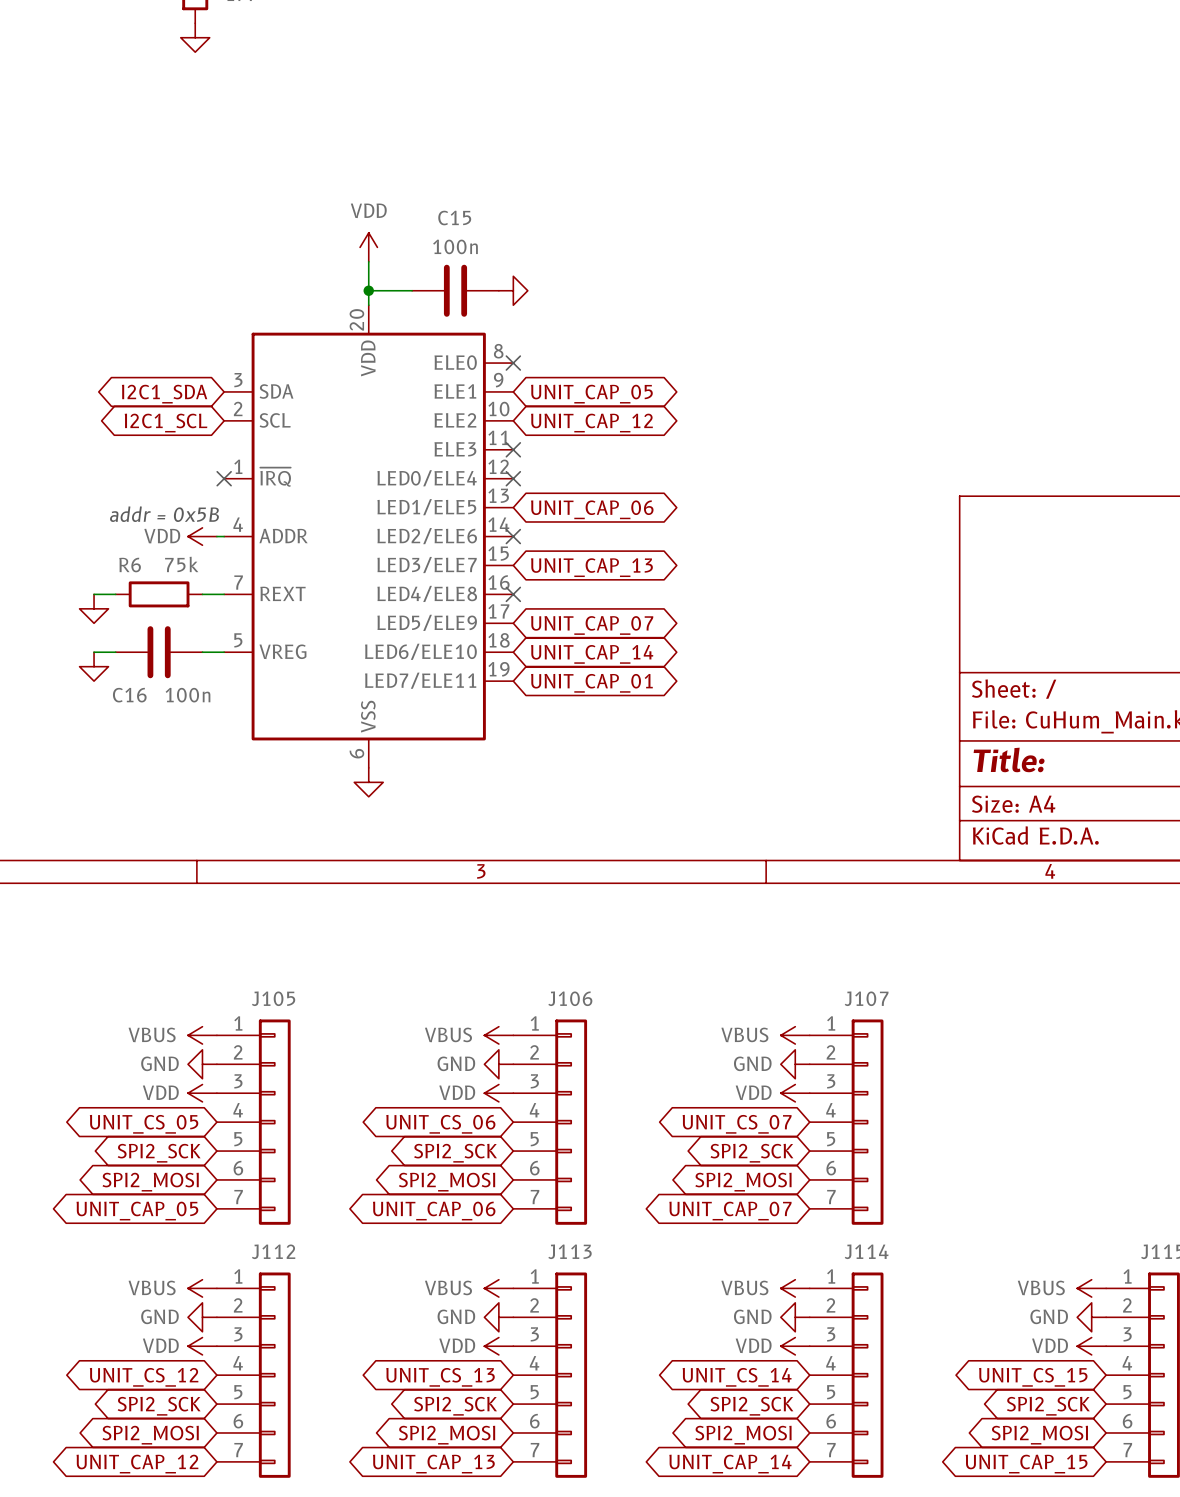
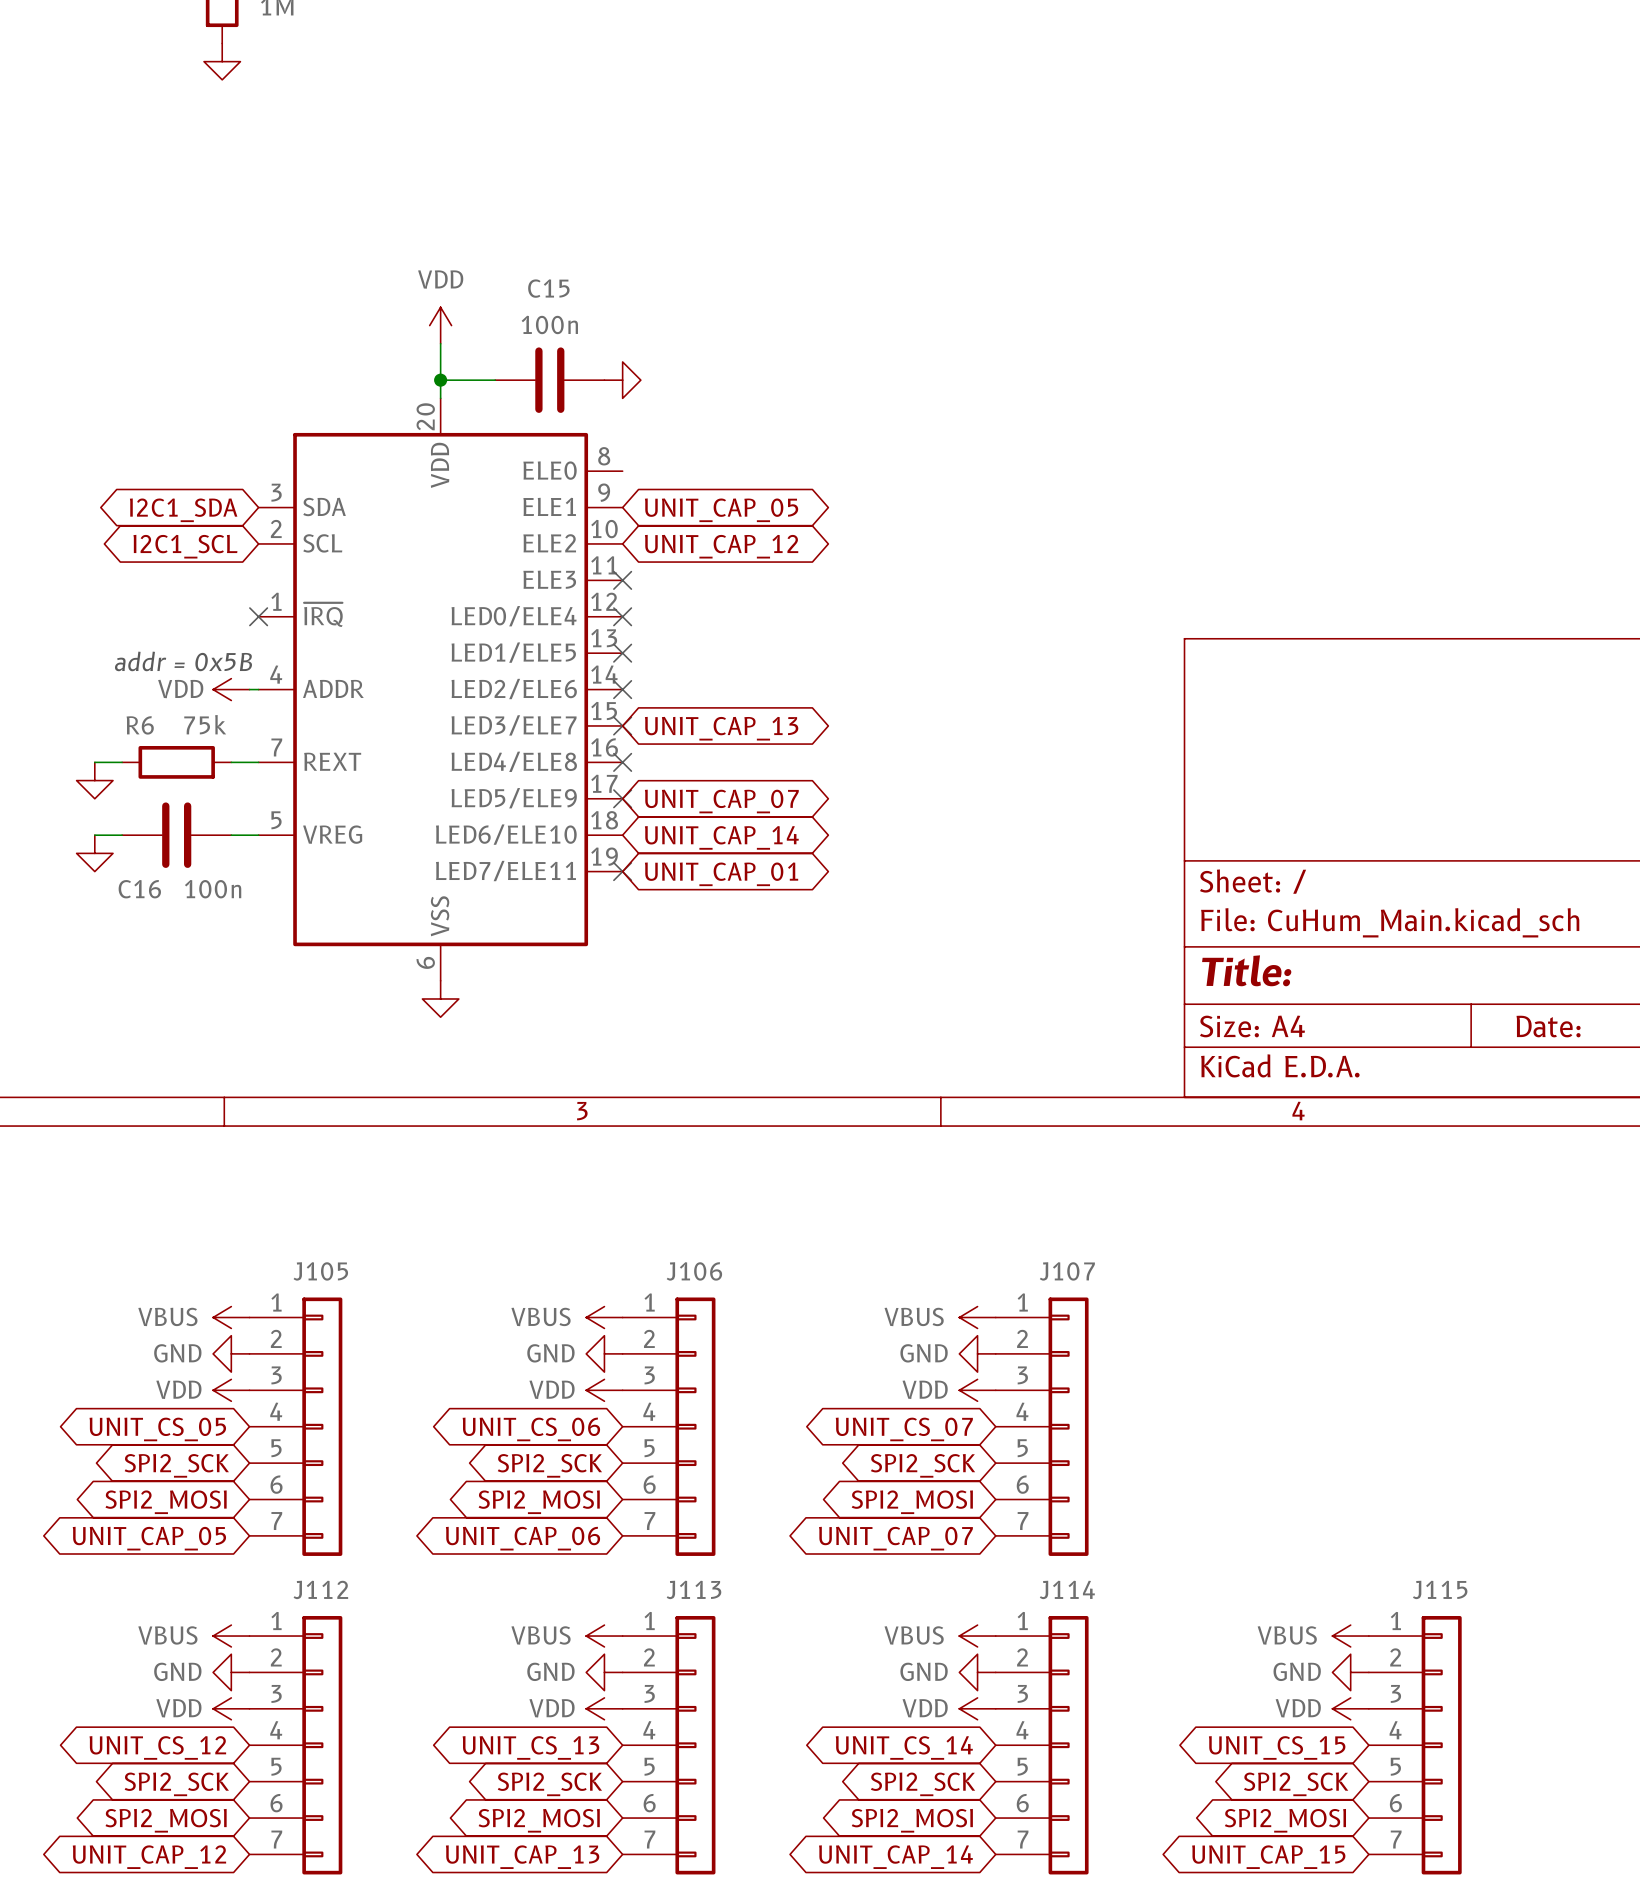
no-connect mark: (513, 363) -> none
no-connect mark: none -> (622, 653)
global label: UNIT_CAP_06 (592, 509) -> none
no-connect mark: none -> (622, 725)
no-connect mark: none -> (622, 798)
no-connect mark: none -> (622, 871)

